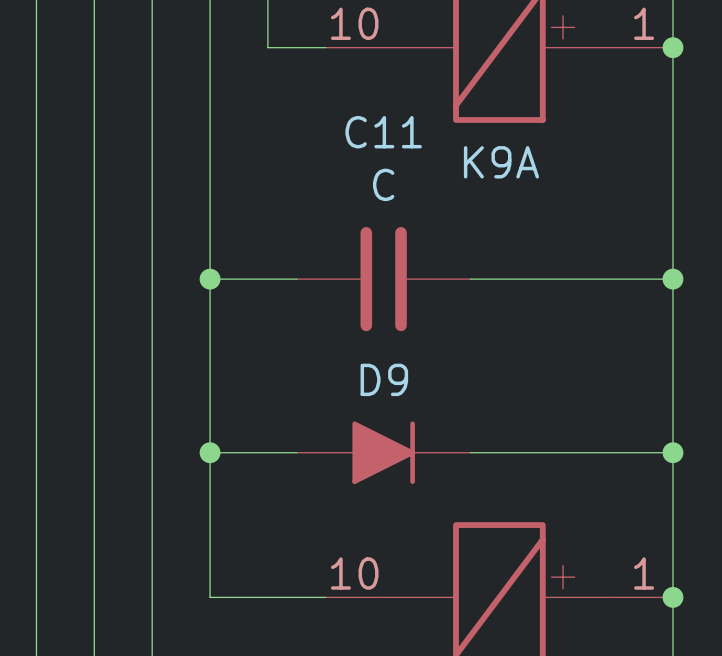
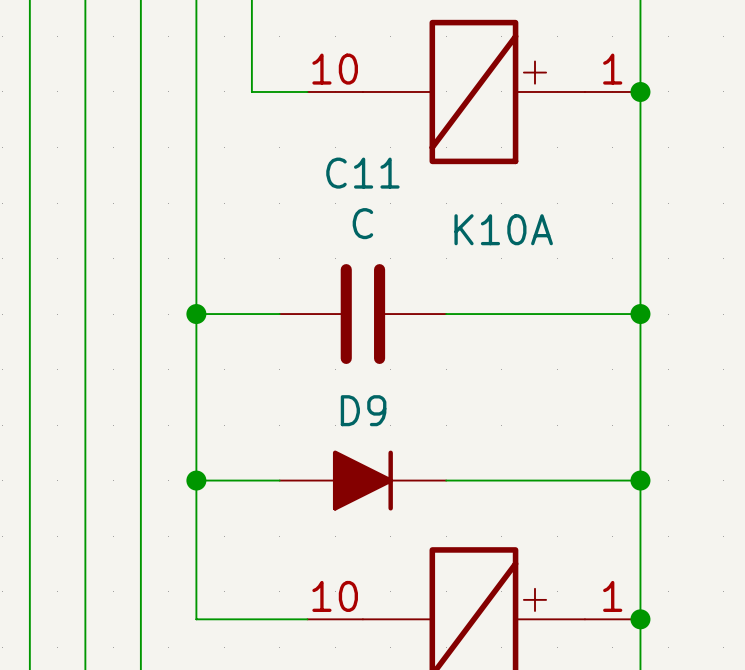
K9A name: K9A (501, 162) -> K10A (503, 229)

